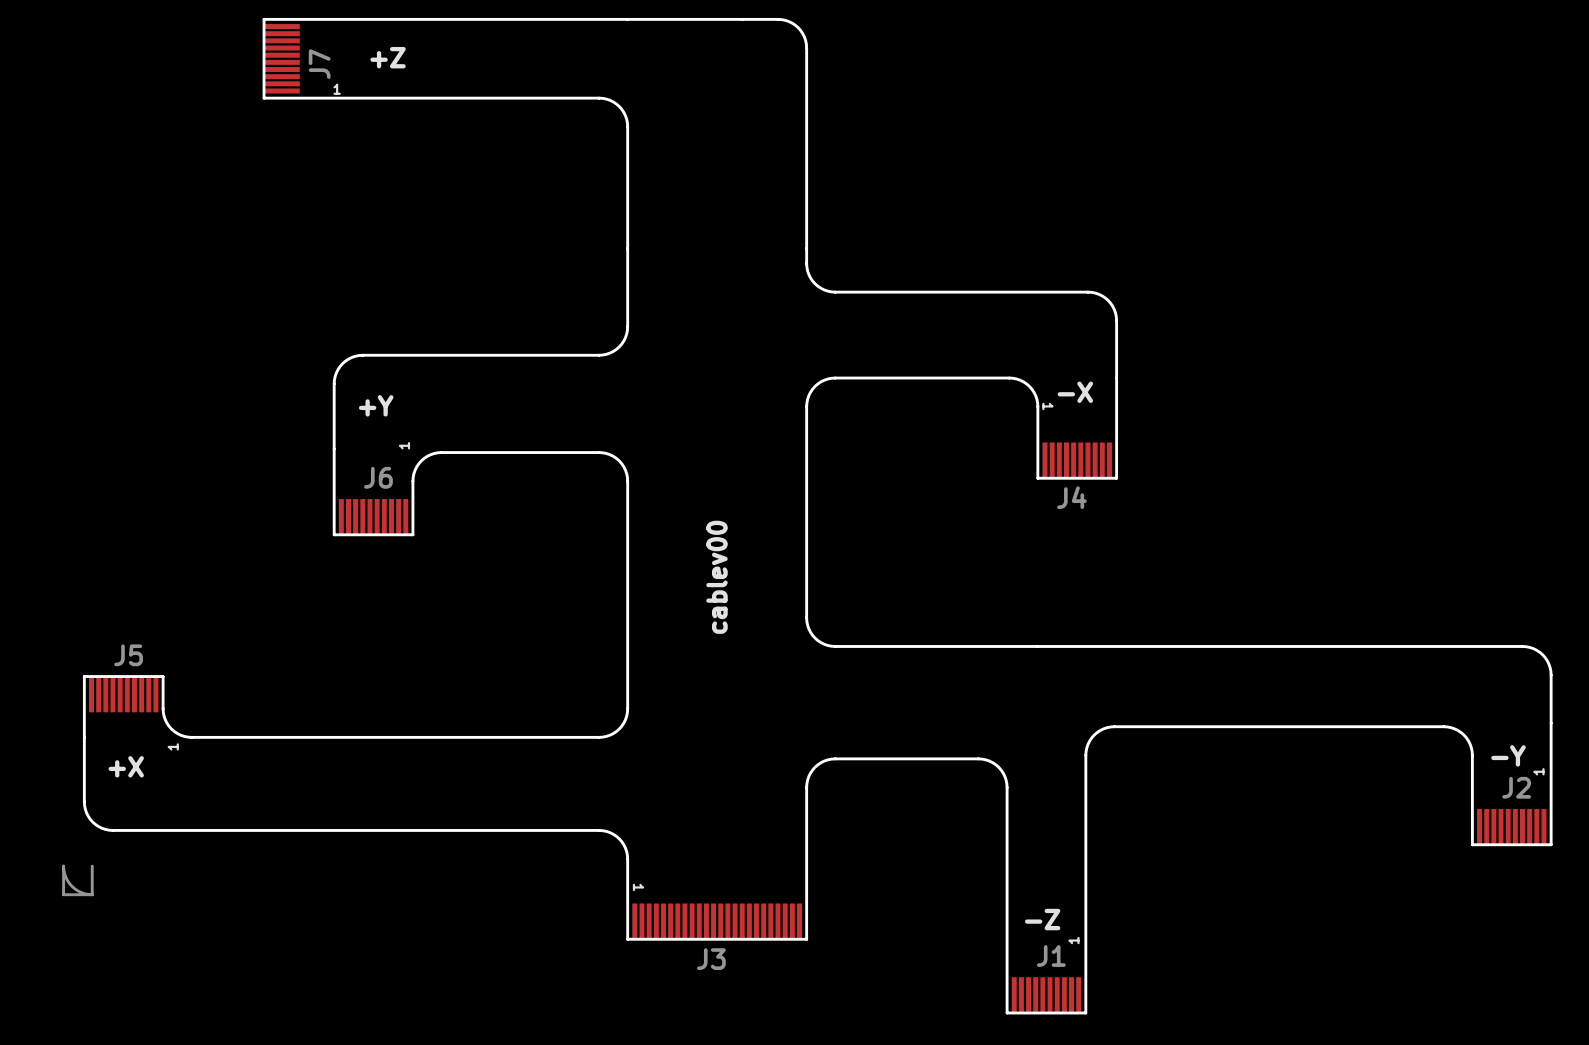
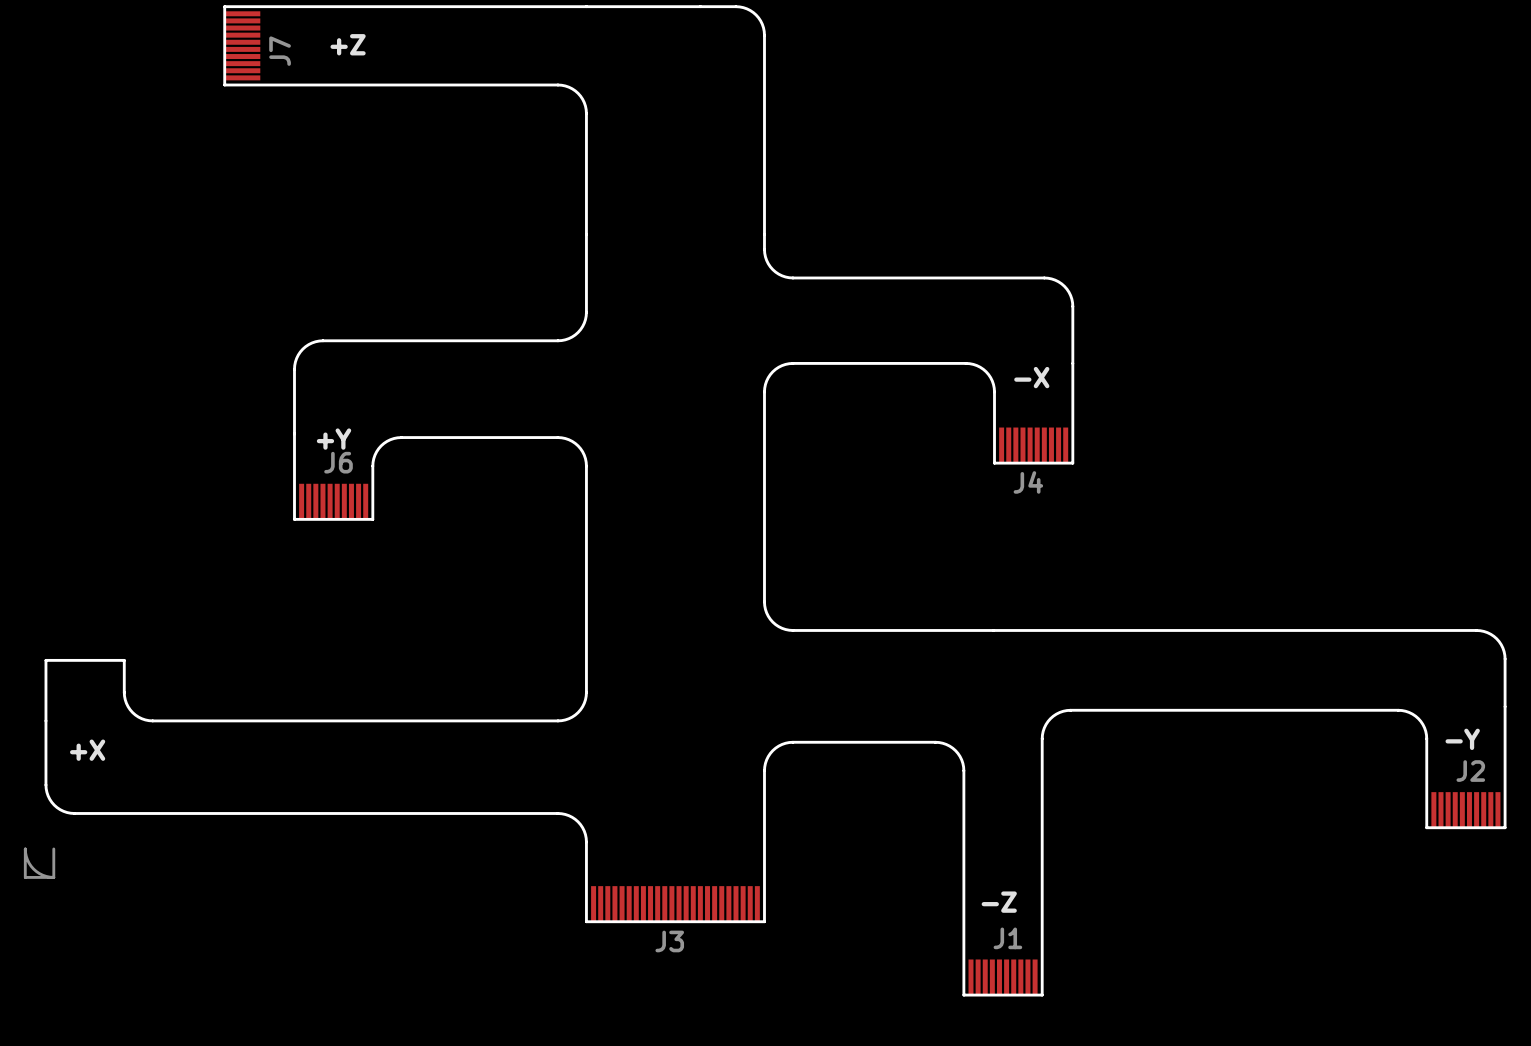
text: 1 (337, 89) -> none
text position: +Y (376, 405) -> +Y (334, 439)
text: 1 (1047, 406) -> none
text: 1 (404, 445) -> none
text: cablev00 (716, 577) -> none
J5: (123, 694) -> none
text: 1 (173, 746) -> none
text: 1 (1538, 771) -> none
text: 1 (638, 887) -> none
text: 1 (1073, 940) -> none

